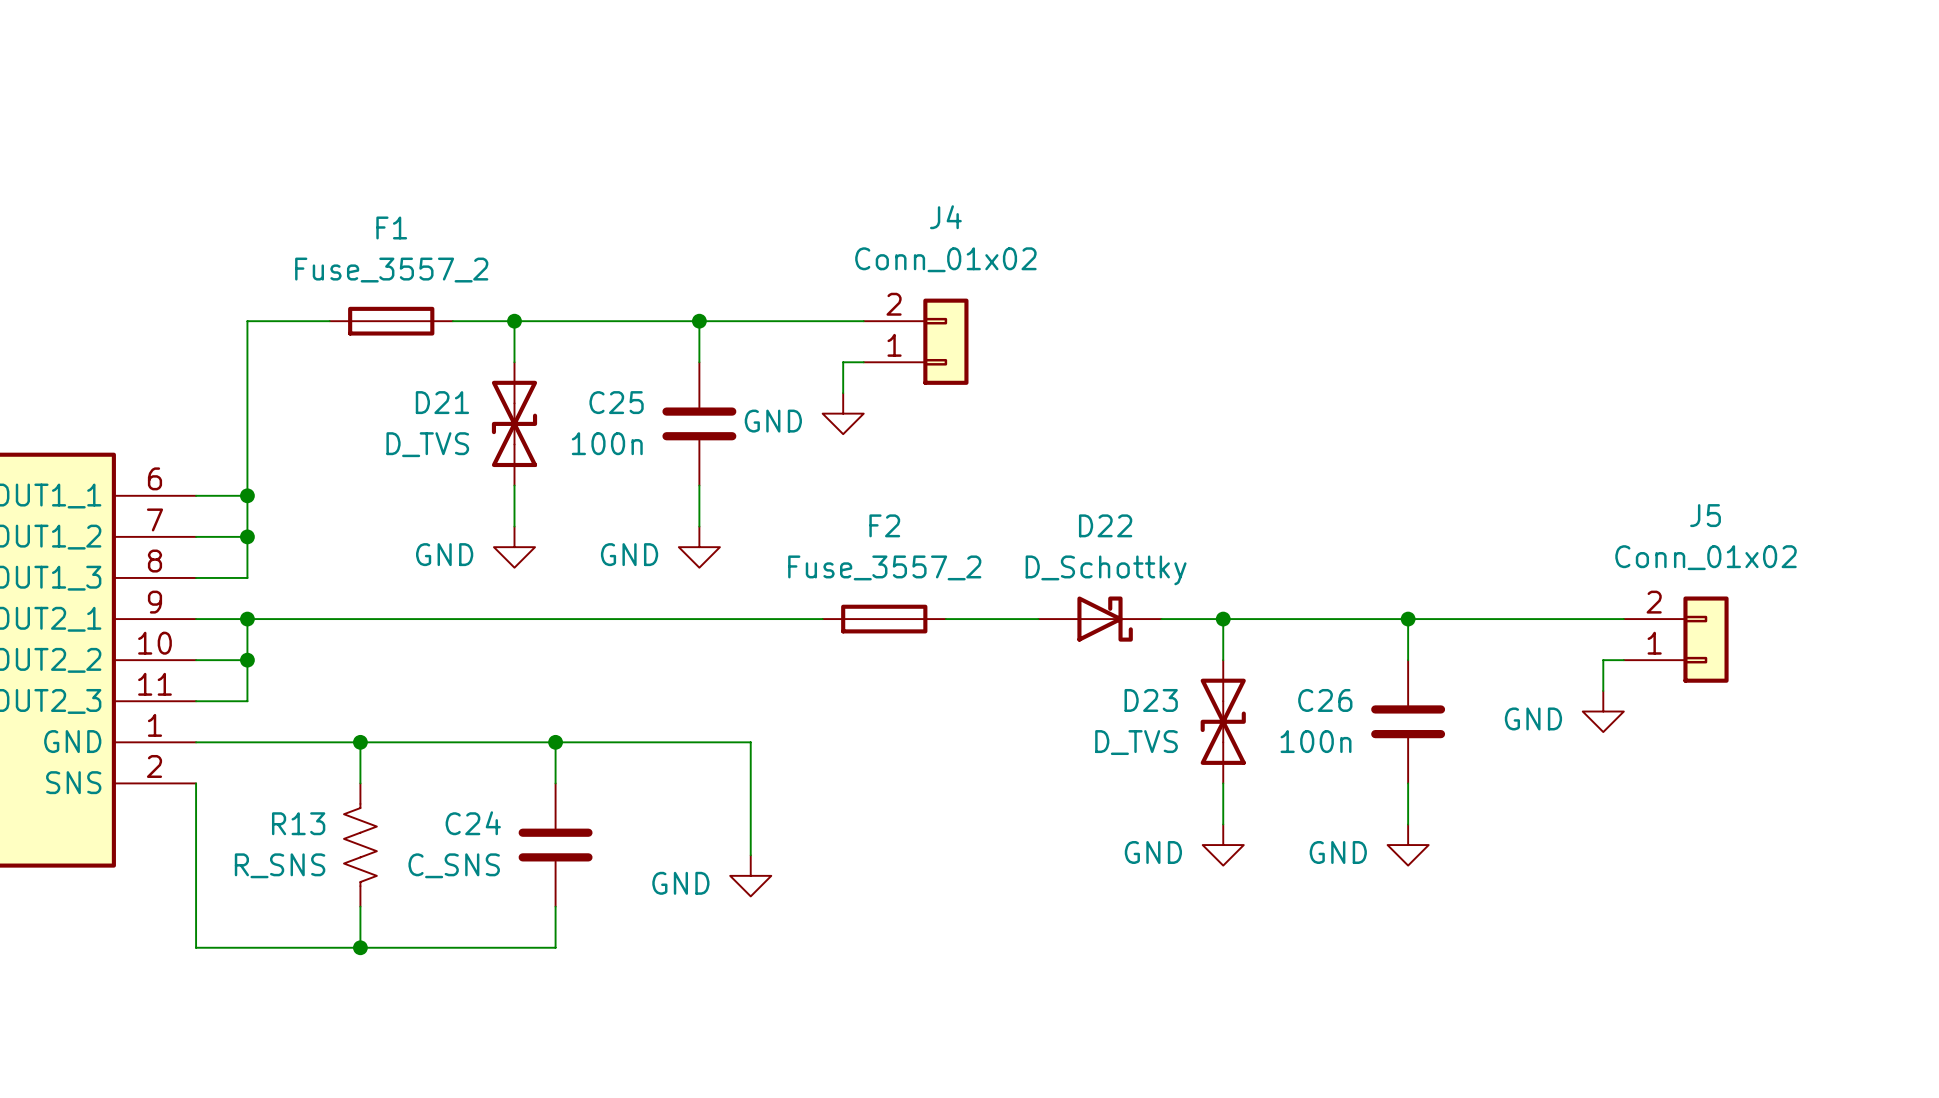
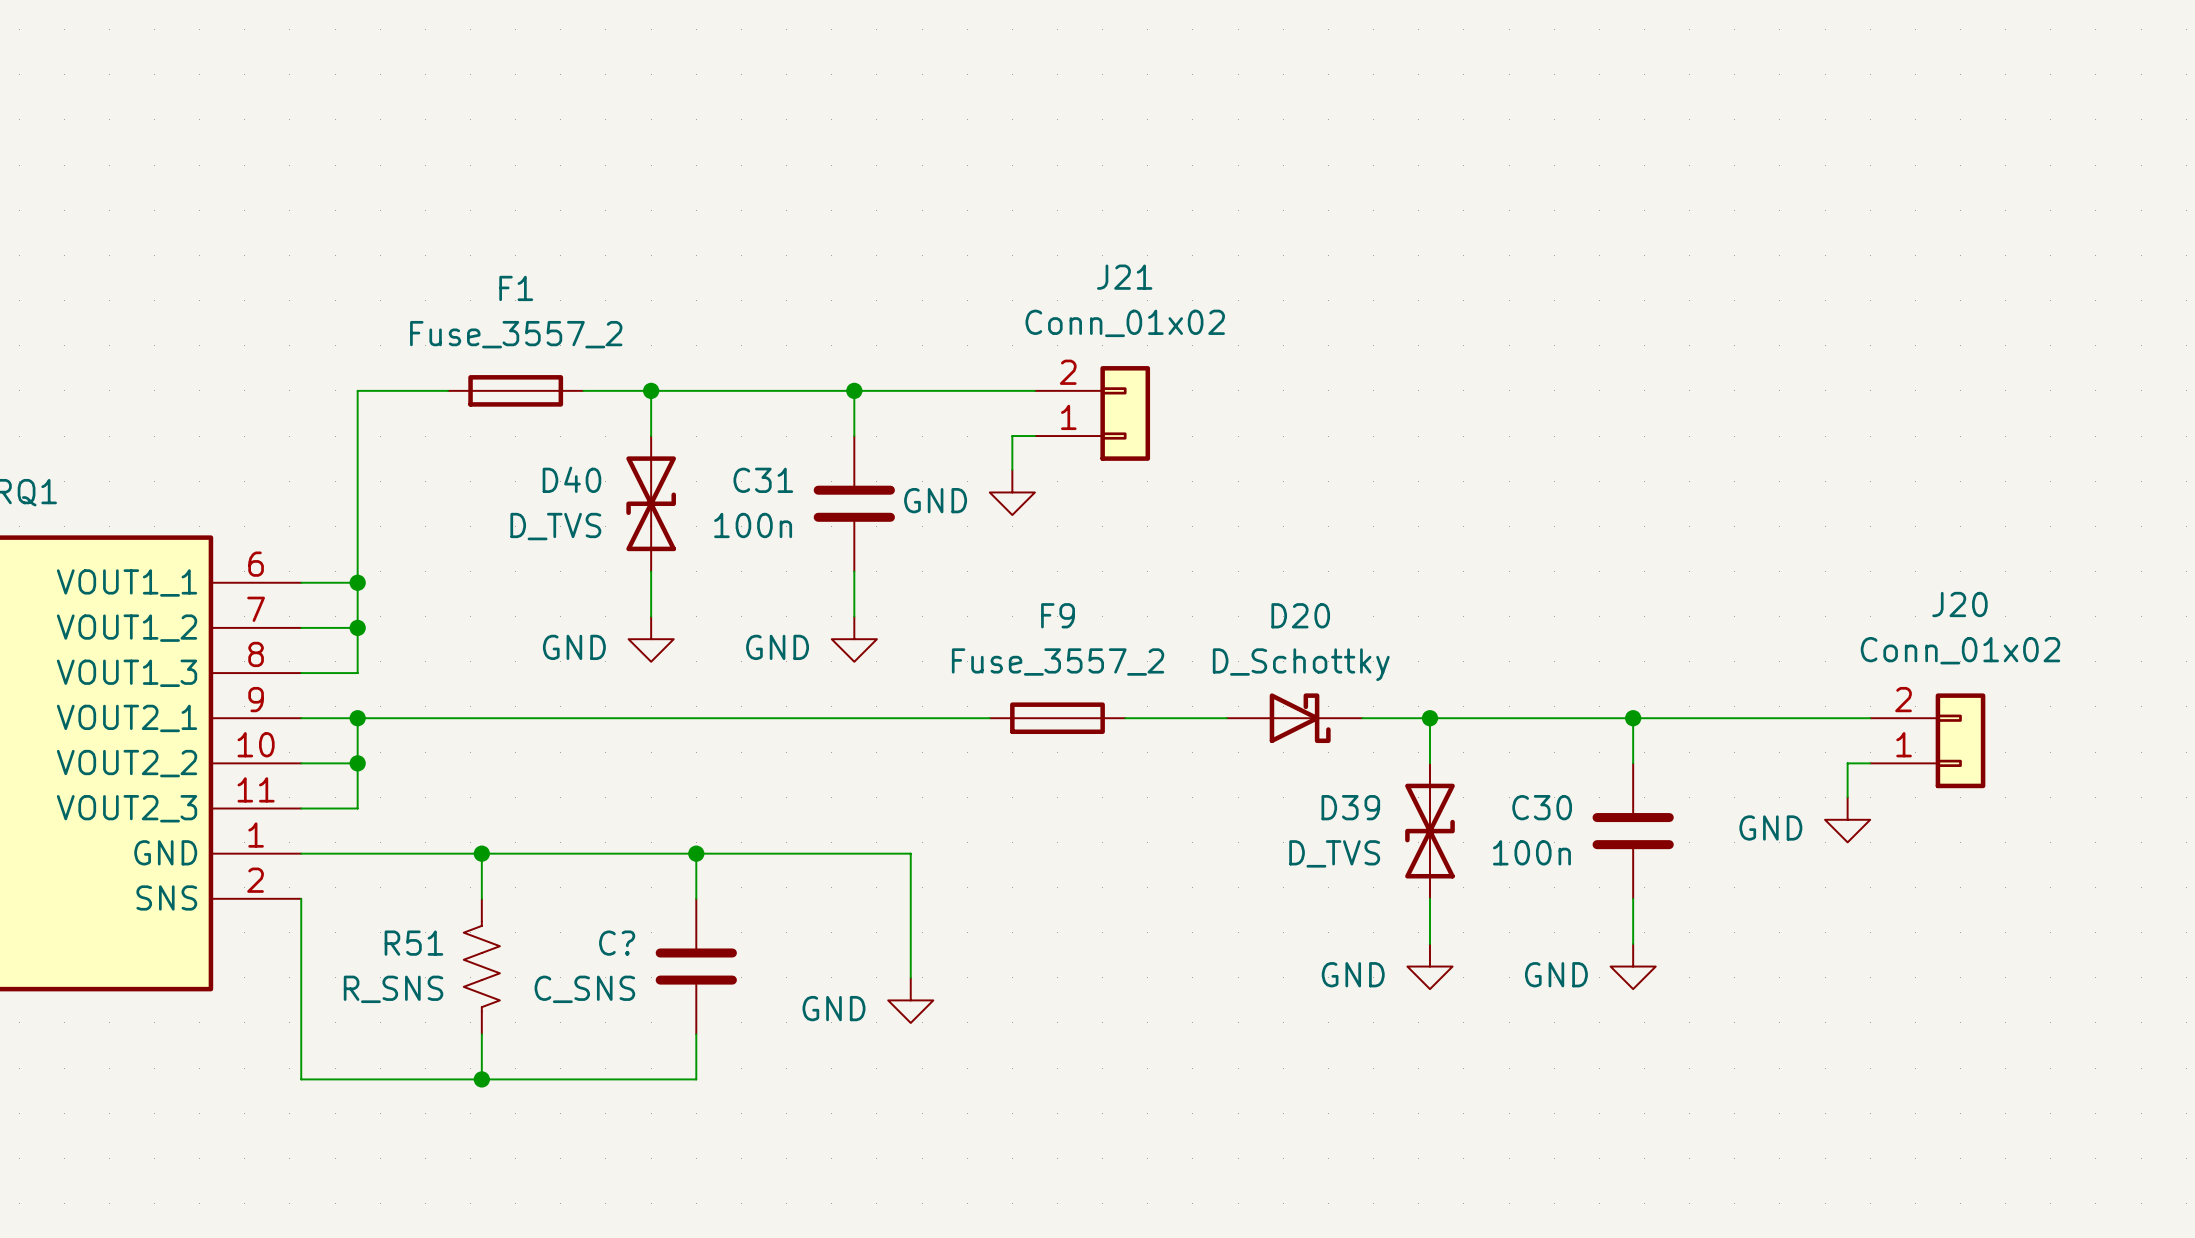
J4 name: J4 (945, 217) -> J21 (1124, 277)
D21 name: D21 (442, 402) -> D40 (571, 479)
C25 name: C25 (616, 402) -> C31 (763, 480)
J5 name: J5 (1705, 515) -> J20 (1959, 604)
F2 name: F2 (884, 525) -> F9 (1058, 615)
D22 name: D22 (1105, 525) -> D20 (1300, 615)
D23 name: D23 (1151, 700) -> D39 (1350, 807)
C26 name: C26 (1325, 700) -> C30 (1542, 807)
R13 name: R13 (298, 823) -> R51 (413, 943)
C24 name: C24 (473, 823) -> C? (617, 943)

